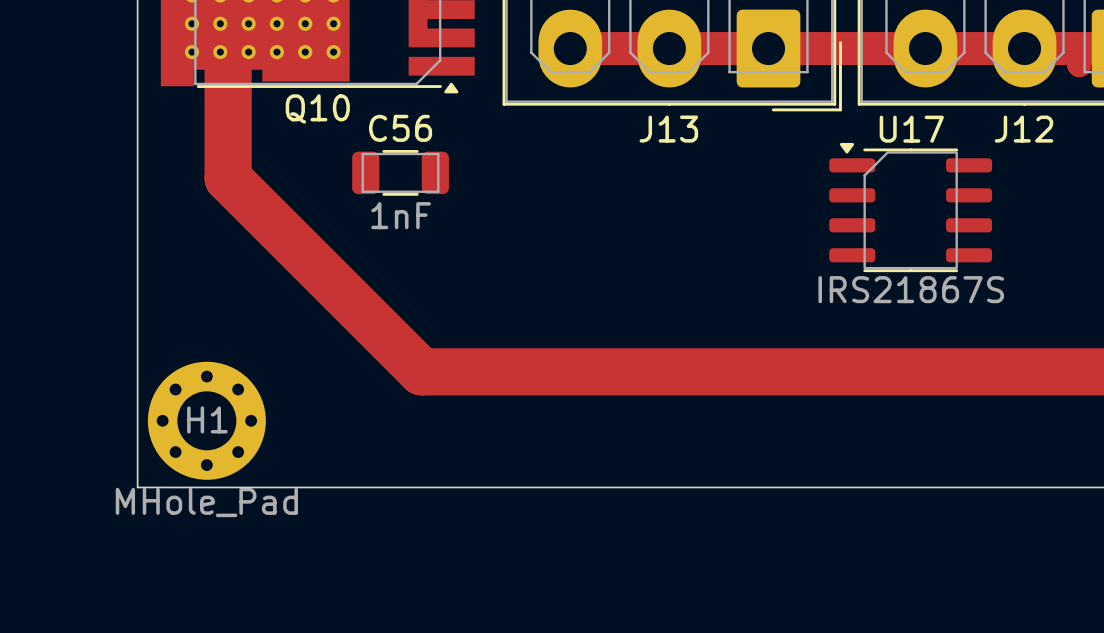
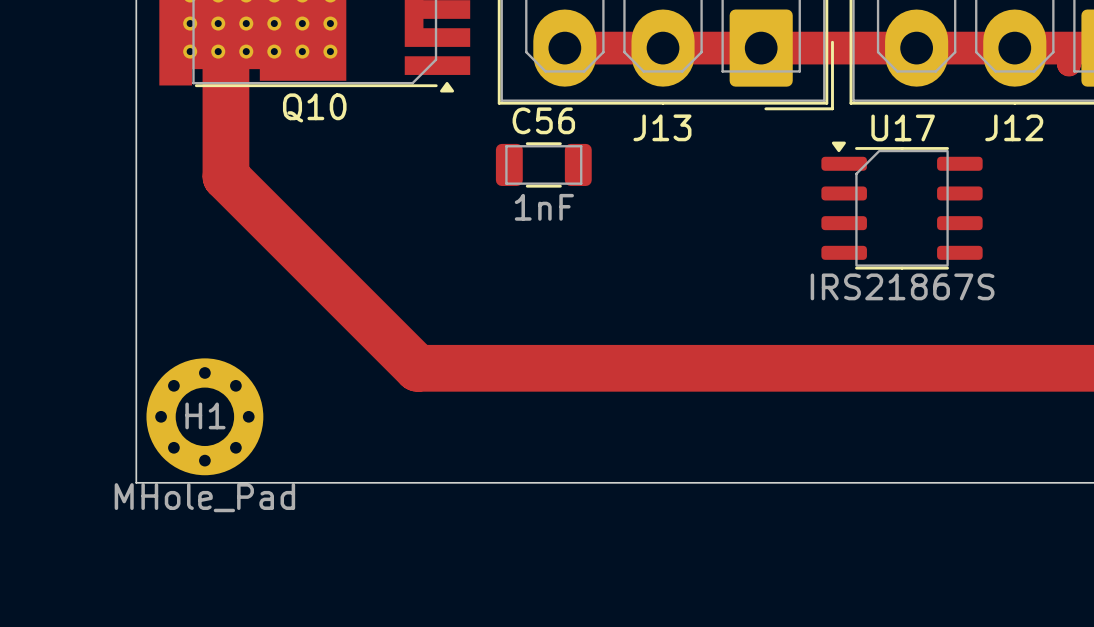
C56 position: (400, 172) -> (543, 164)

